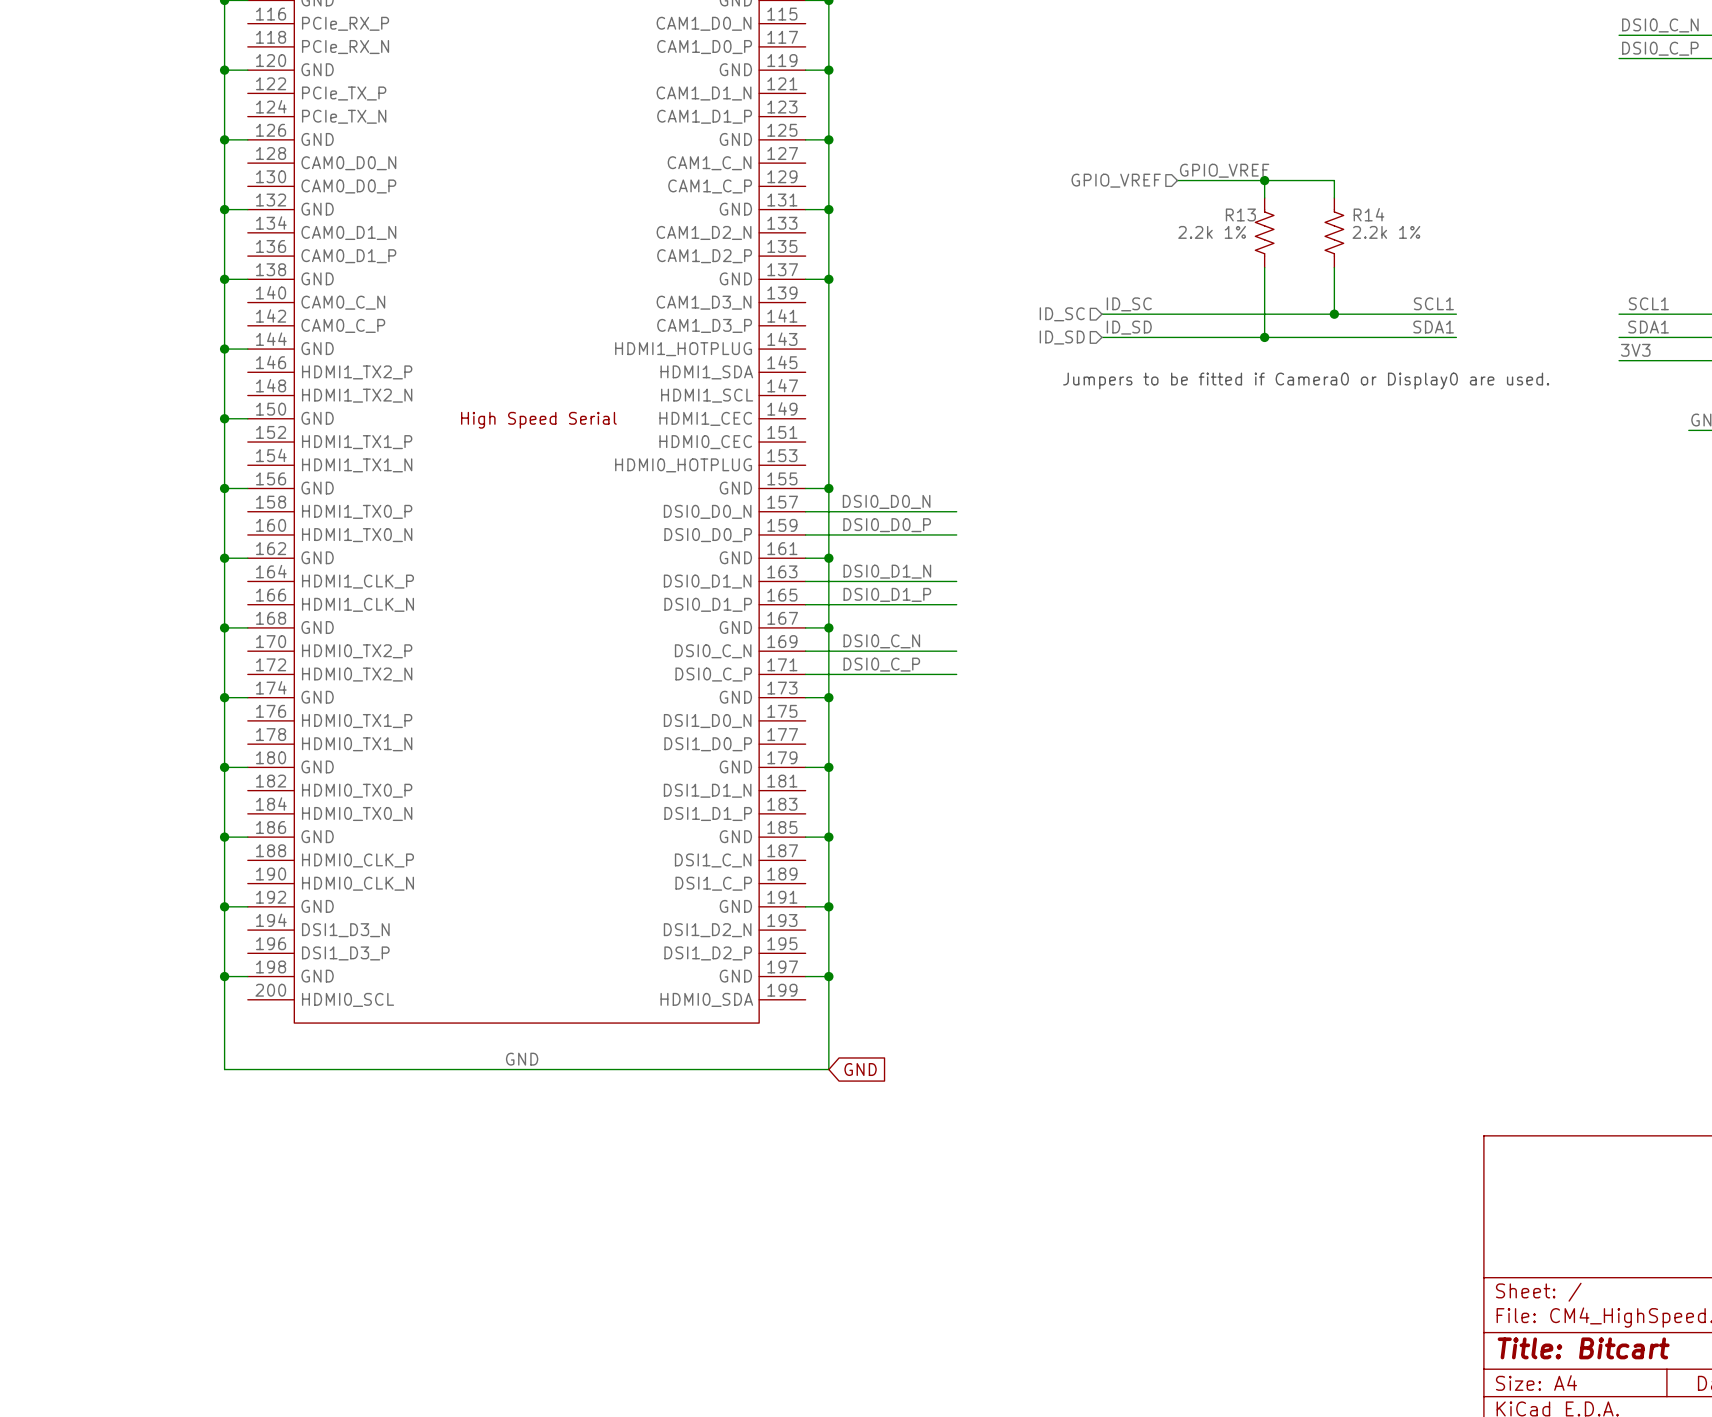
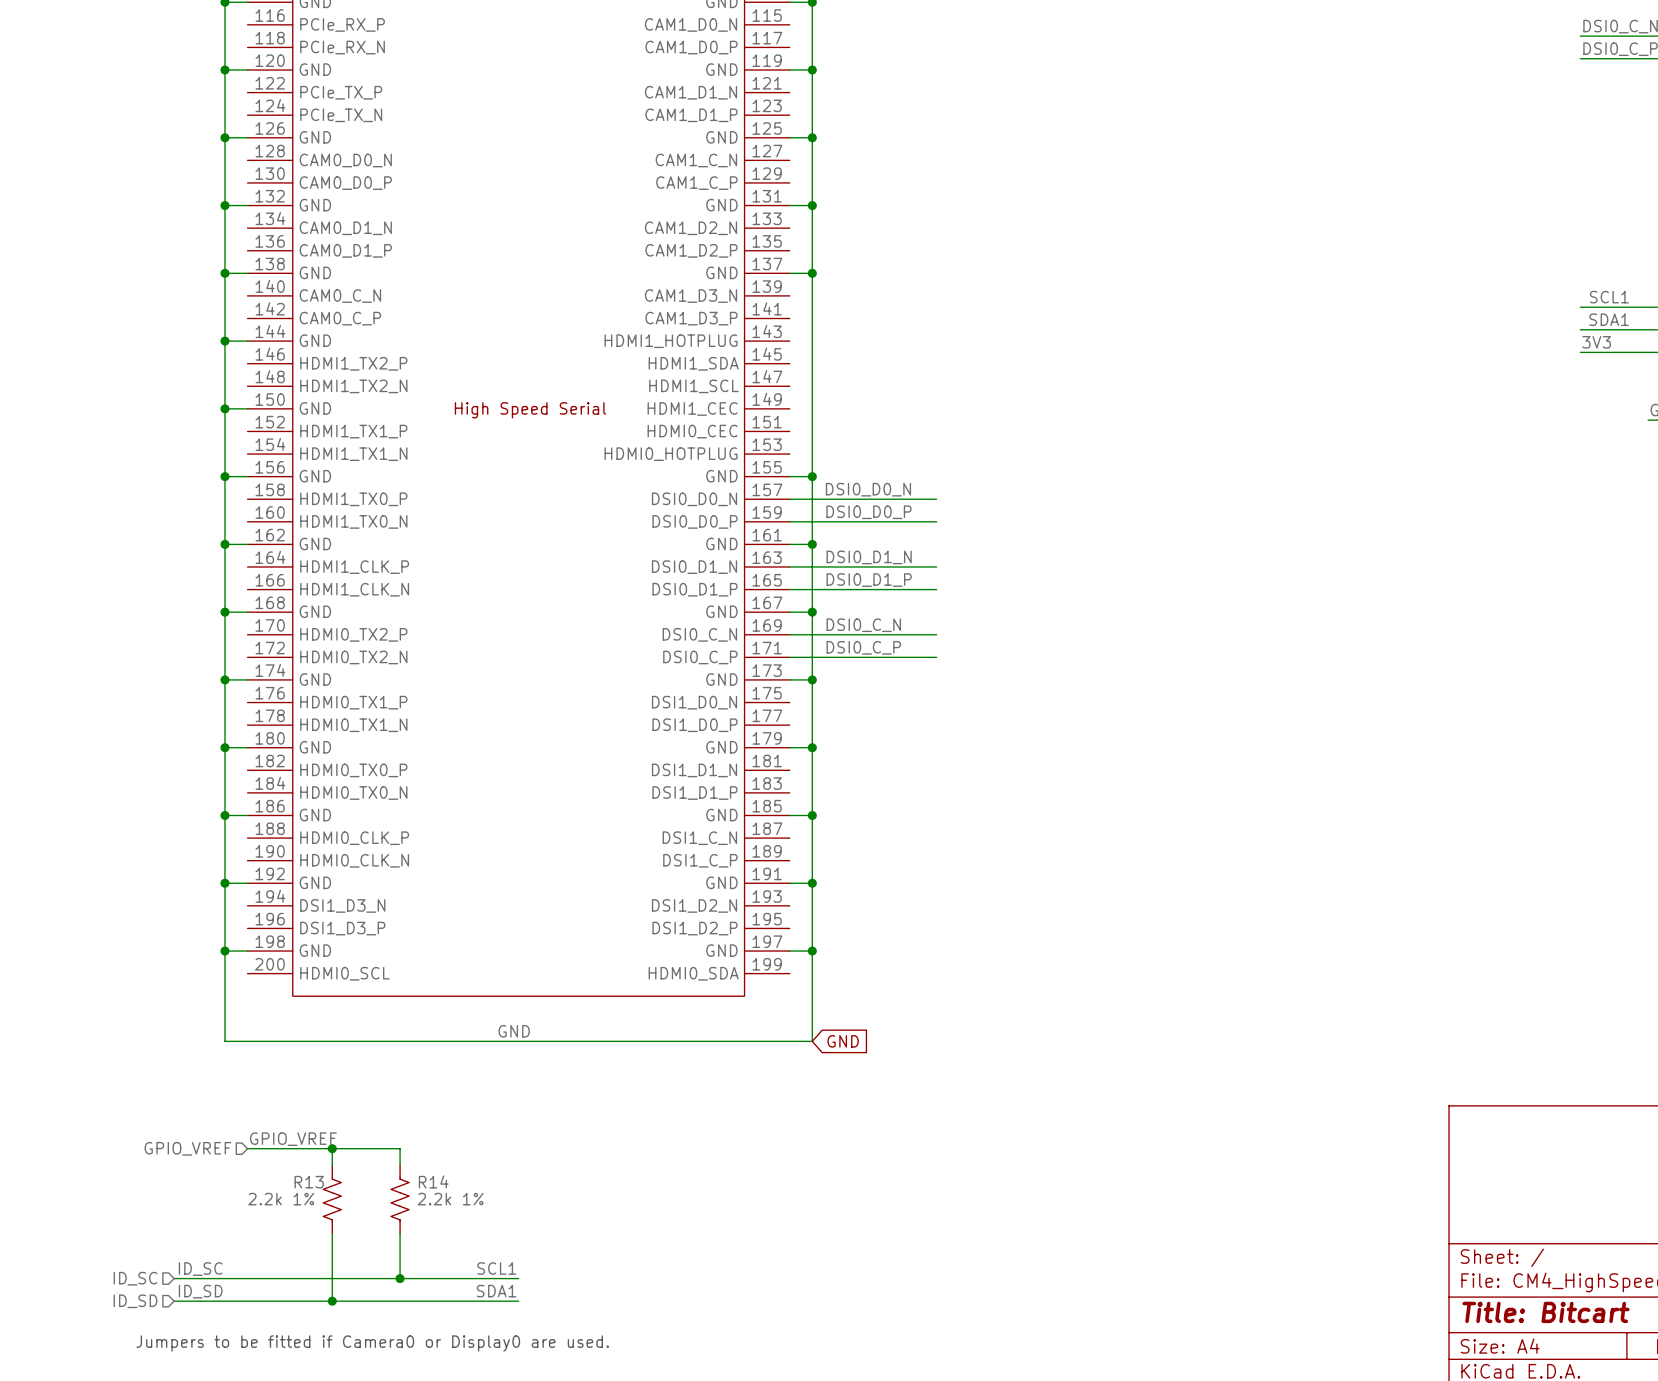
label: GPIO_VREF (1224, 170) -> none
hierarchical label: GPIO_VREF (1116, 180) -> none
wire: (1177, 180) (1334, 180) (1334, 197) -> none
wire: (1264, 180) (1264, 197) -> none
junction: (1264, 180) -> none
R13 position: (1264, 232) -> (332, 1199)
R14 position: (1334, 232) -> (400, 1199)
wire: (1264, 267) (1264, 337) -> none
wire: (1334, 267) (1334, 314) -> none
label: SCL1 (1433, 303) -> none
label: ID_SC (1129, 304) -> none
hierarchical label: ID_SC (1062, 314) -> none
wire: (1101, 314) (1456, 314) -> none
junction: (1334, 314) -> none
label: ID_SD (1129, 327) -> none
label: SDA1 (1433, 327) -> none
hierarchical label: ID_SD (1062, 337) -> none
wire: (1101, 337) (1456, 337) -> none
junction: (1264, 337) -> none
text: Jumpers to be fitted if Camera0 or Display0 are used. (1306, 380) -> none
label: none -> GPIO_VREF (293, 1139)
wire: none -> (247, 1148) (400, 1148) (400, 1165)
wire: none -> (332, 1148) (332, 1165)
junction: none -> (332, 1148)
hierarchical label: none -> GPIO_VREF (187, 1148)
wire: none -> (332, 1233) (332, 1301)
wire: none -> (400, 1233) (400, 1278)
label: none -> ID_SC (200, 1269)
label: none -> SCL1 (496, 1268)
hierarchical label: none -> ID_SC (135, 1278)
wire: none -> (174, 1278) (518, 1278)
junction: none -> (400, 1278)
label: none -> ID_SD (200, 1291)
label: none -> SDA1 (496, 1291)
hierarchical label: none -> ID_SD (135, 1301)
wire: none -> (174, 1301) (518, 1301)
junction: none -> (332, 1301)
text: none -> Jumpers to be fitted if Camera0 or Display0 are used. (372, 1343)

